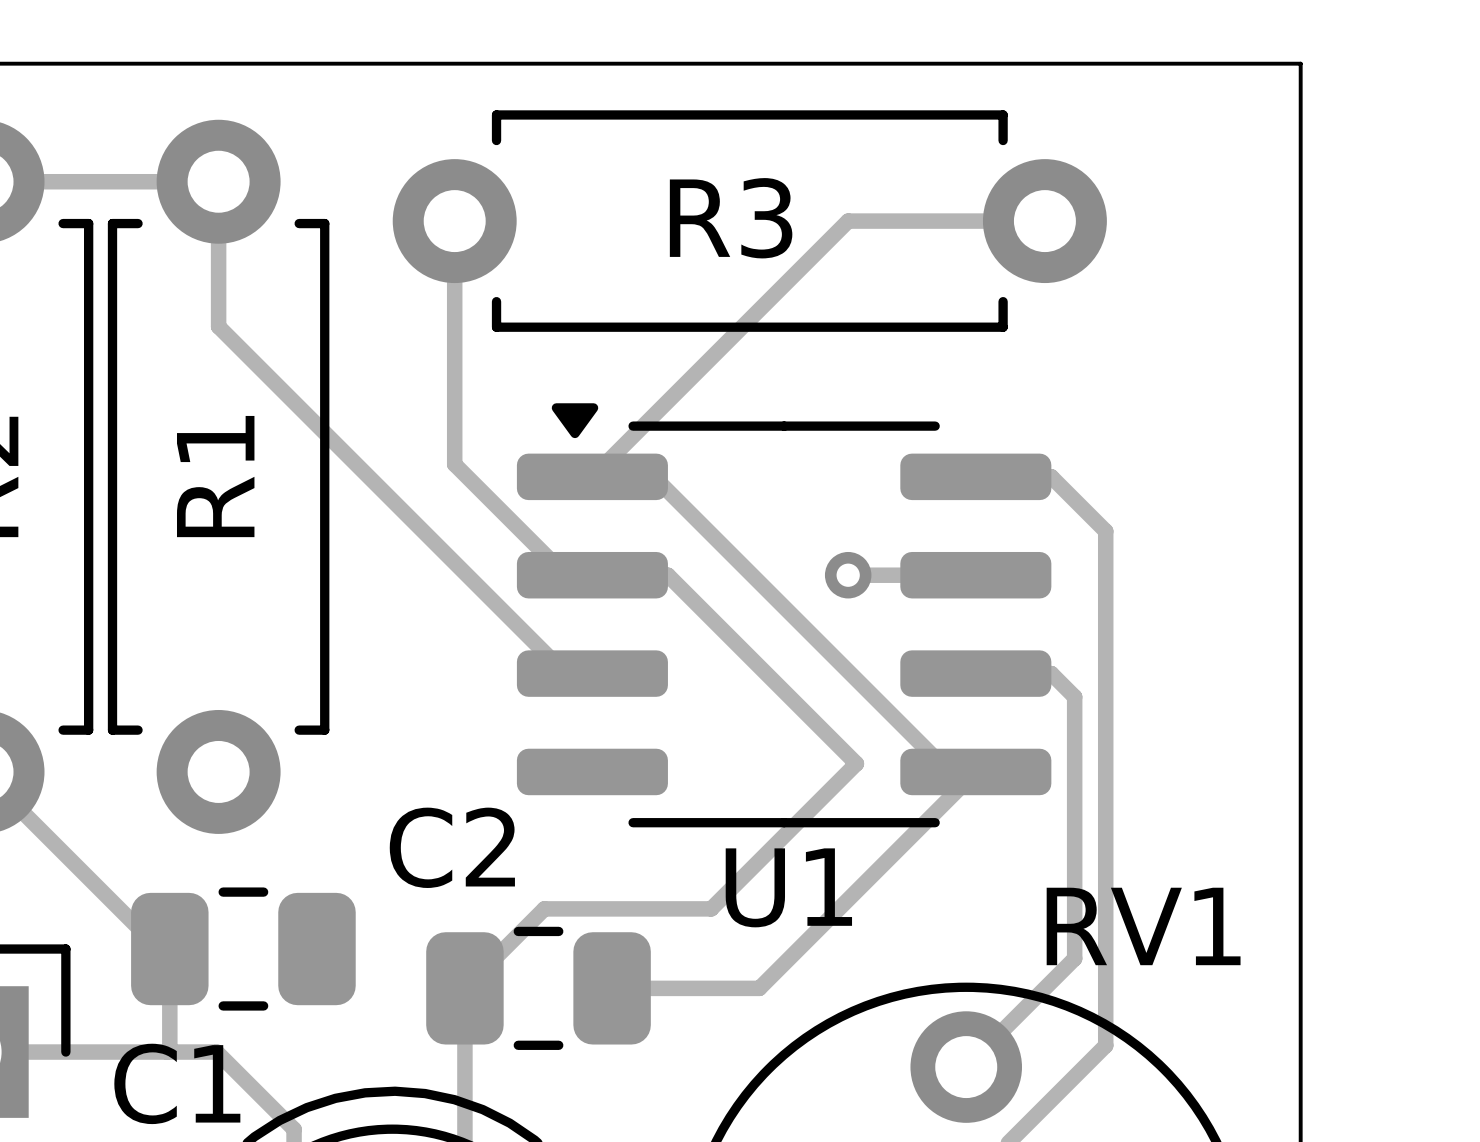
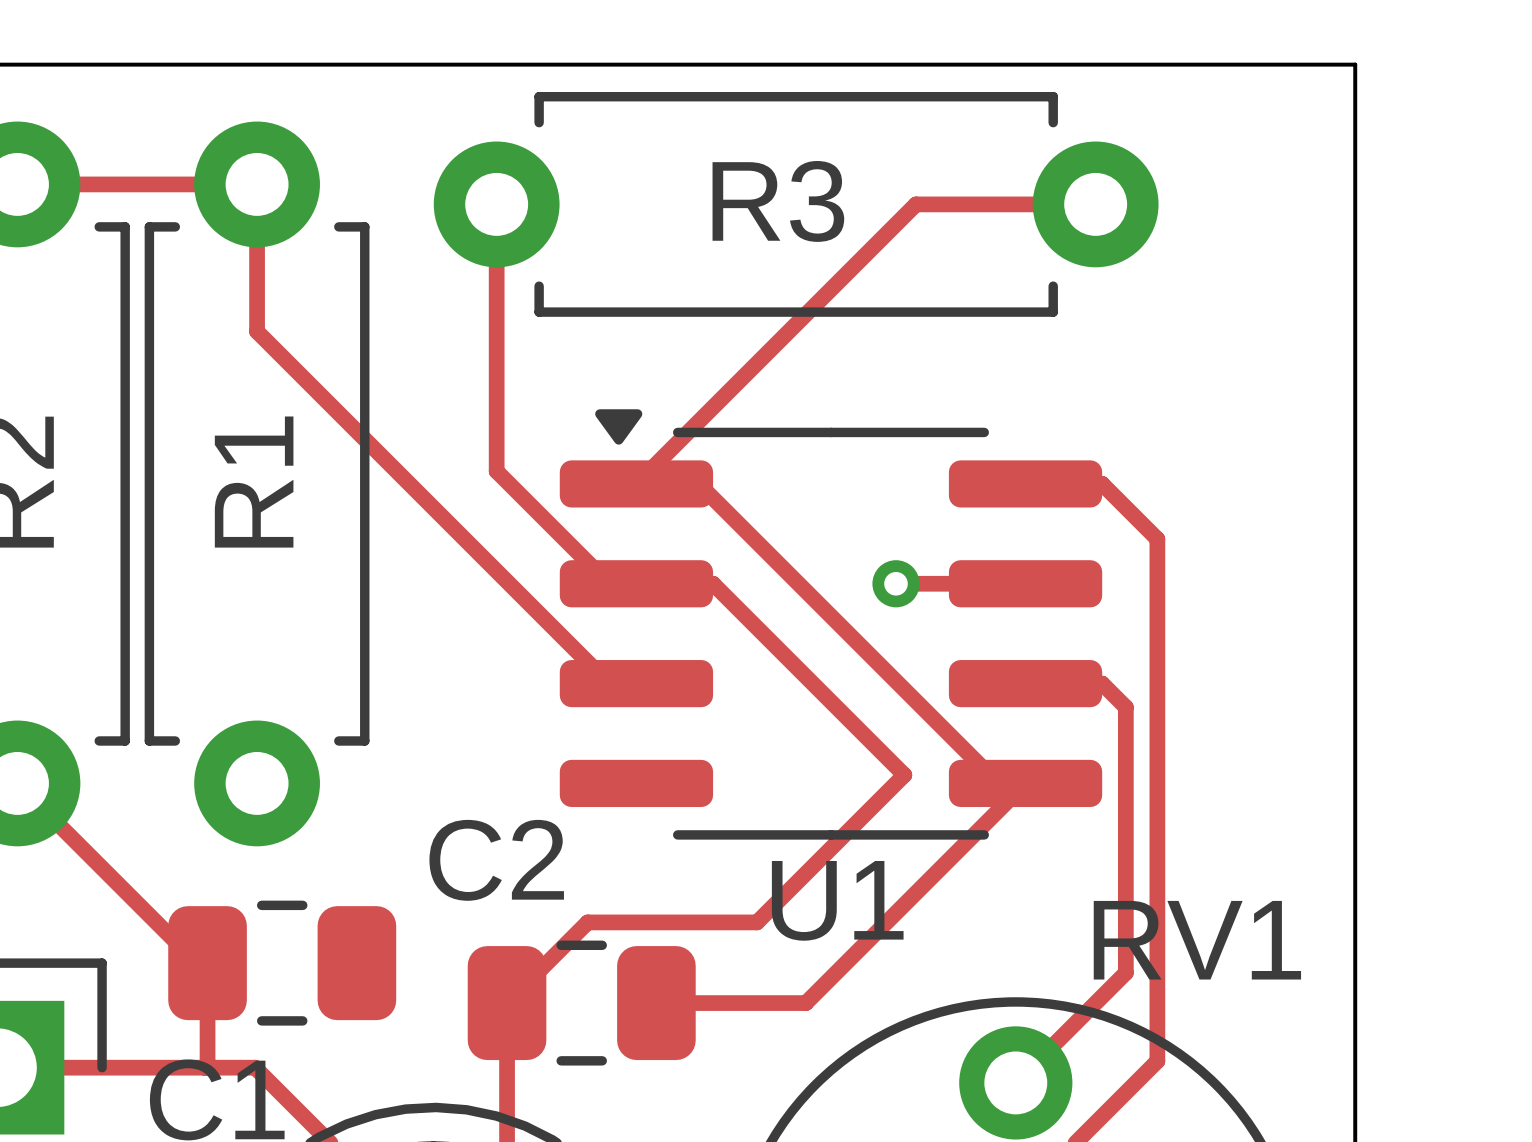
R3 position: (749, 221) -> (796, 204)
track: (848, 221) (1044, 221) -> (896, 224) (915, 204) (1095, 204)

